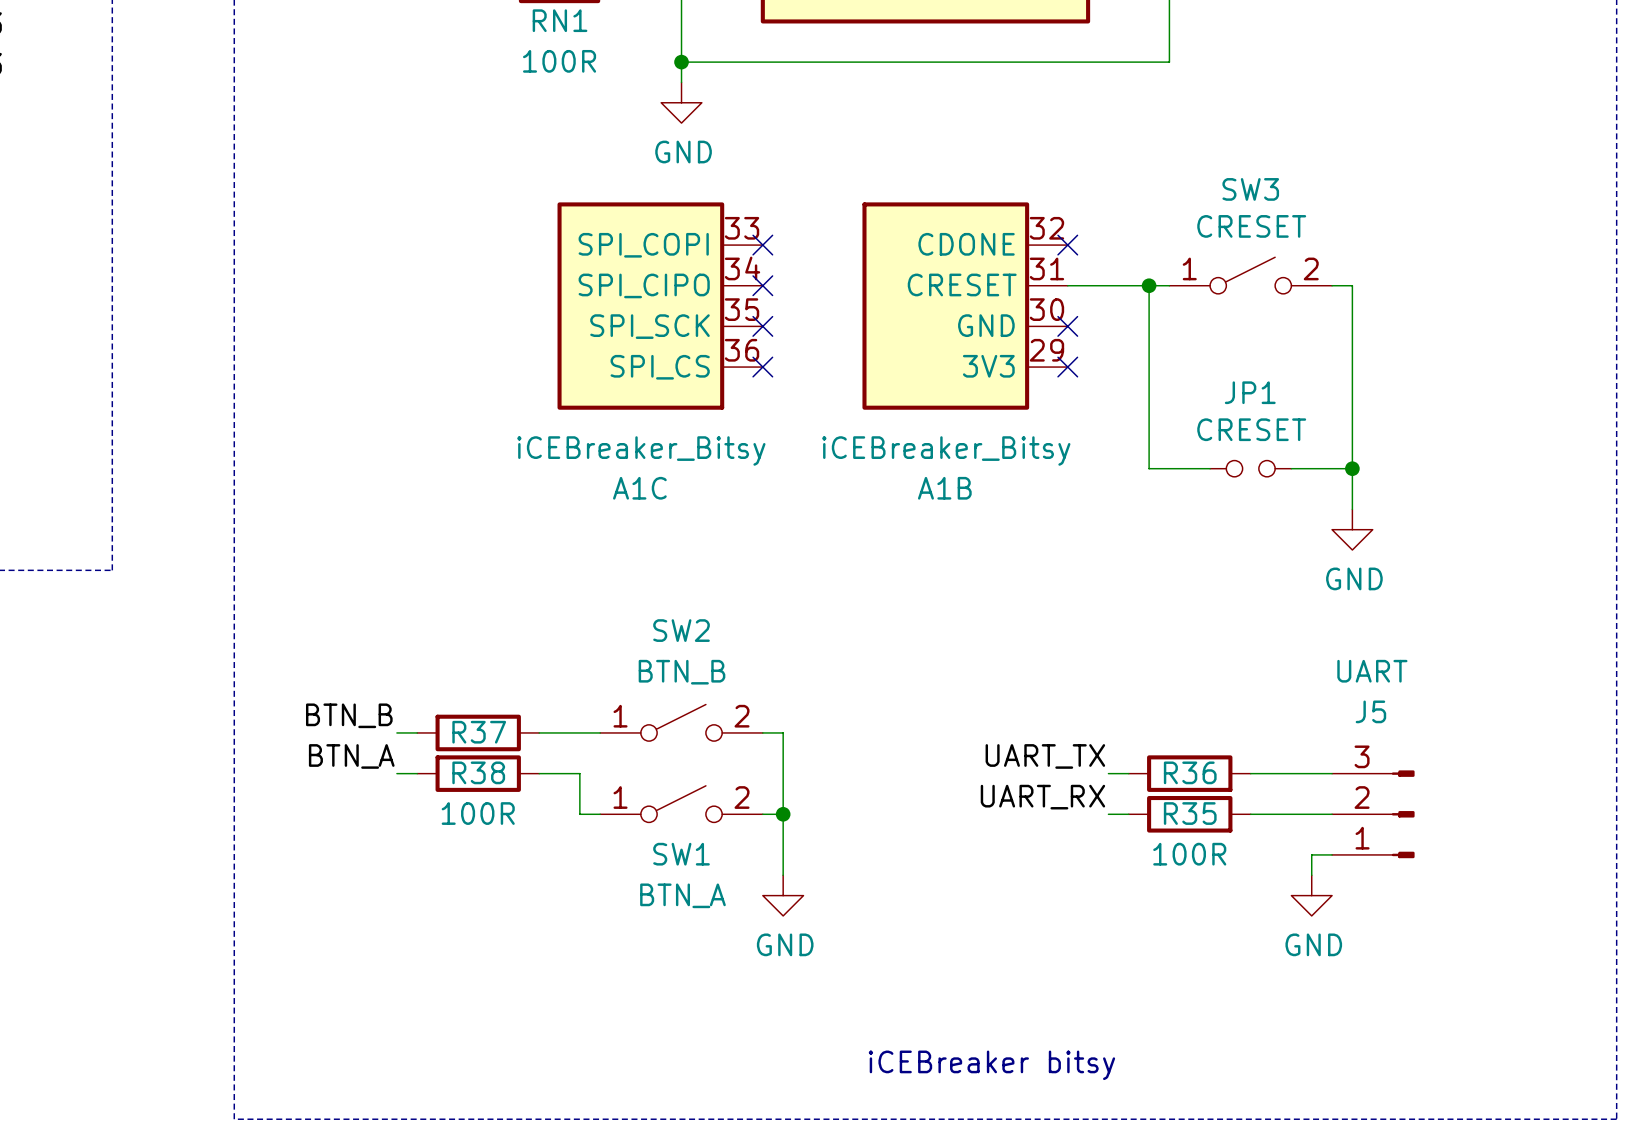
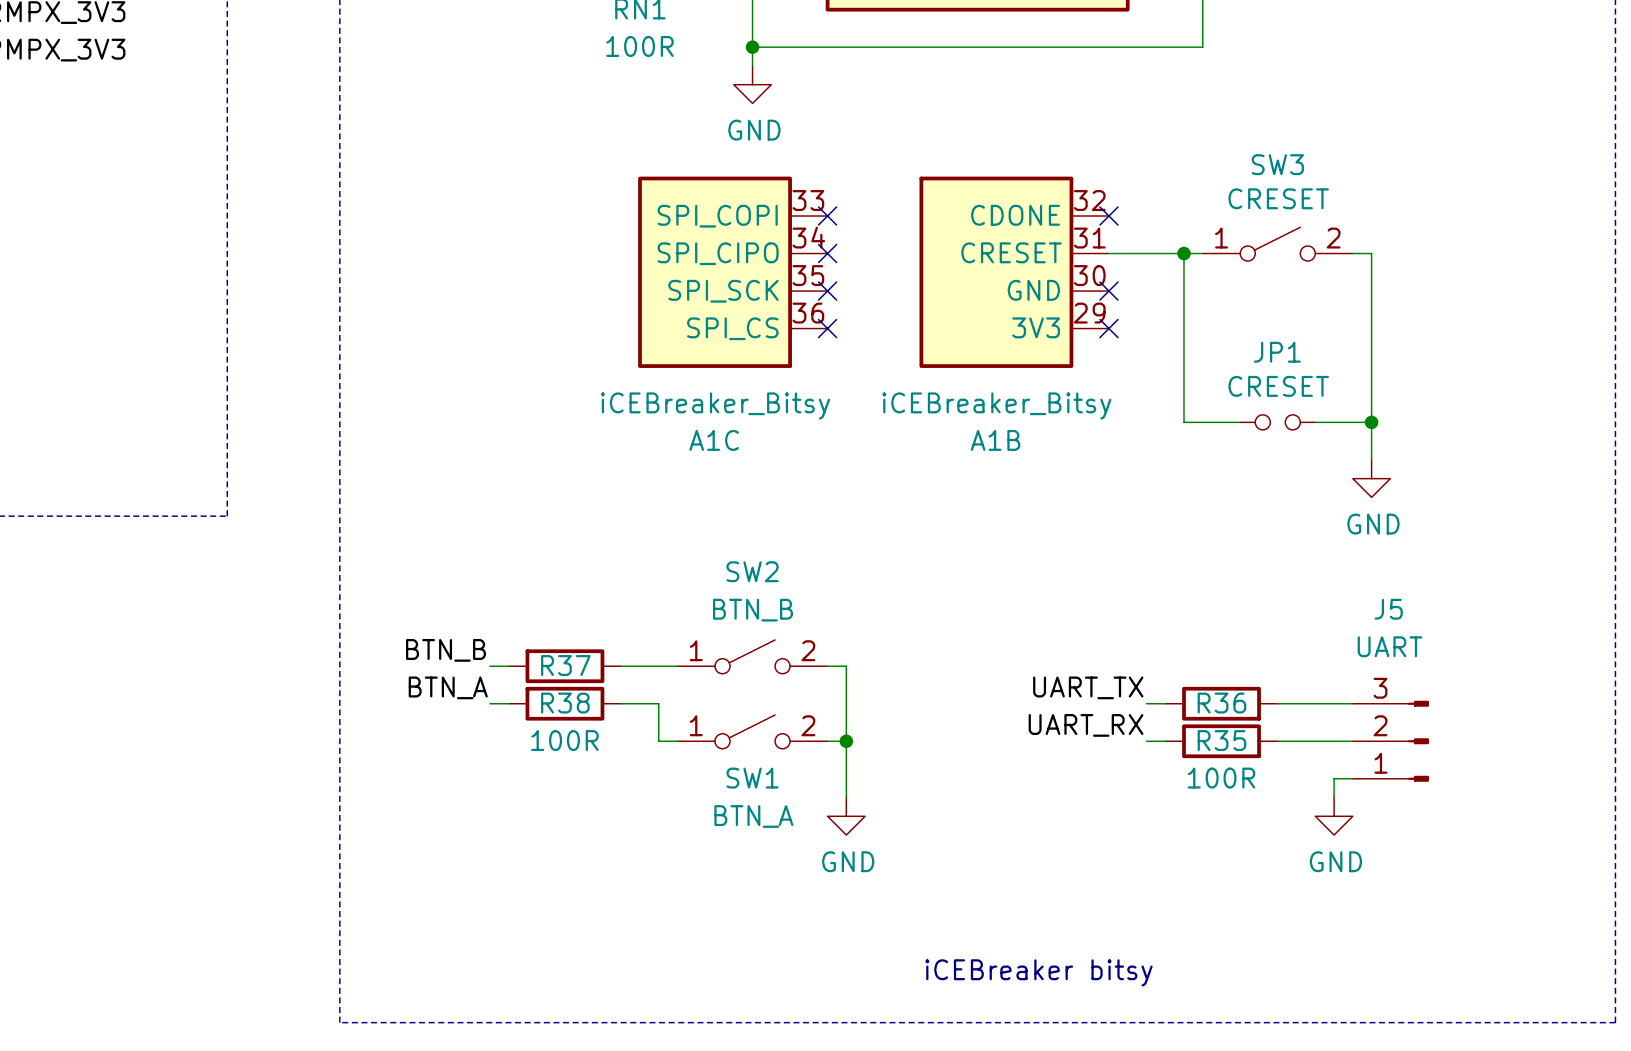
J5 value position: UART (1372, 671) -> UART (1390, 646)
J5 name position: J5 (1370, 711) -> J5 (1388, 609)

